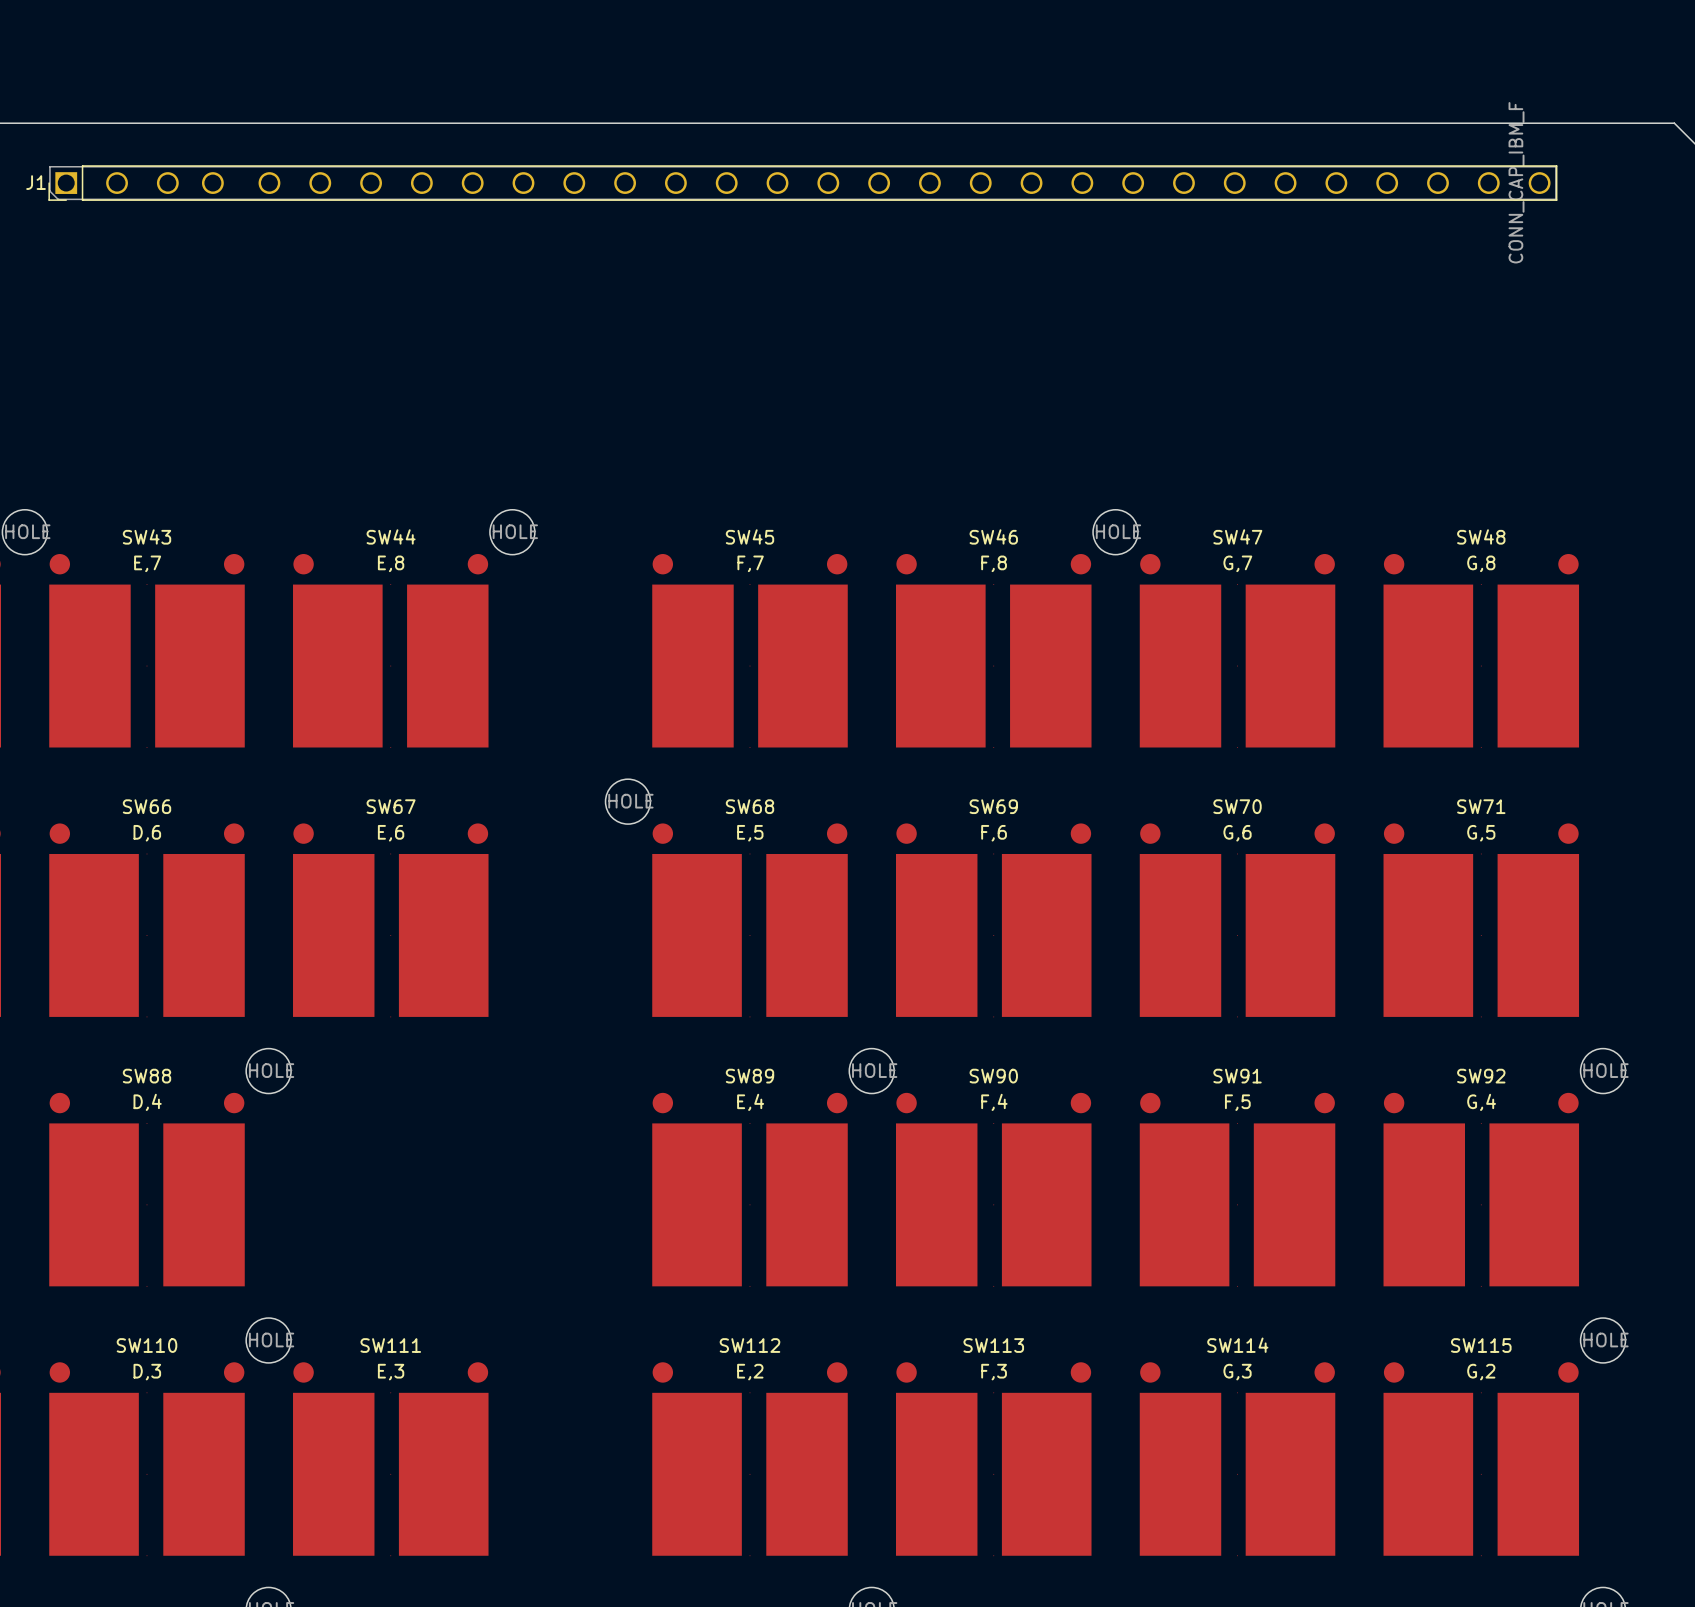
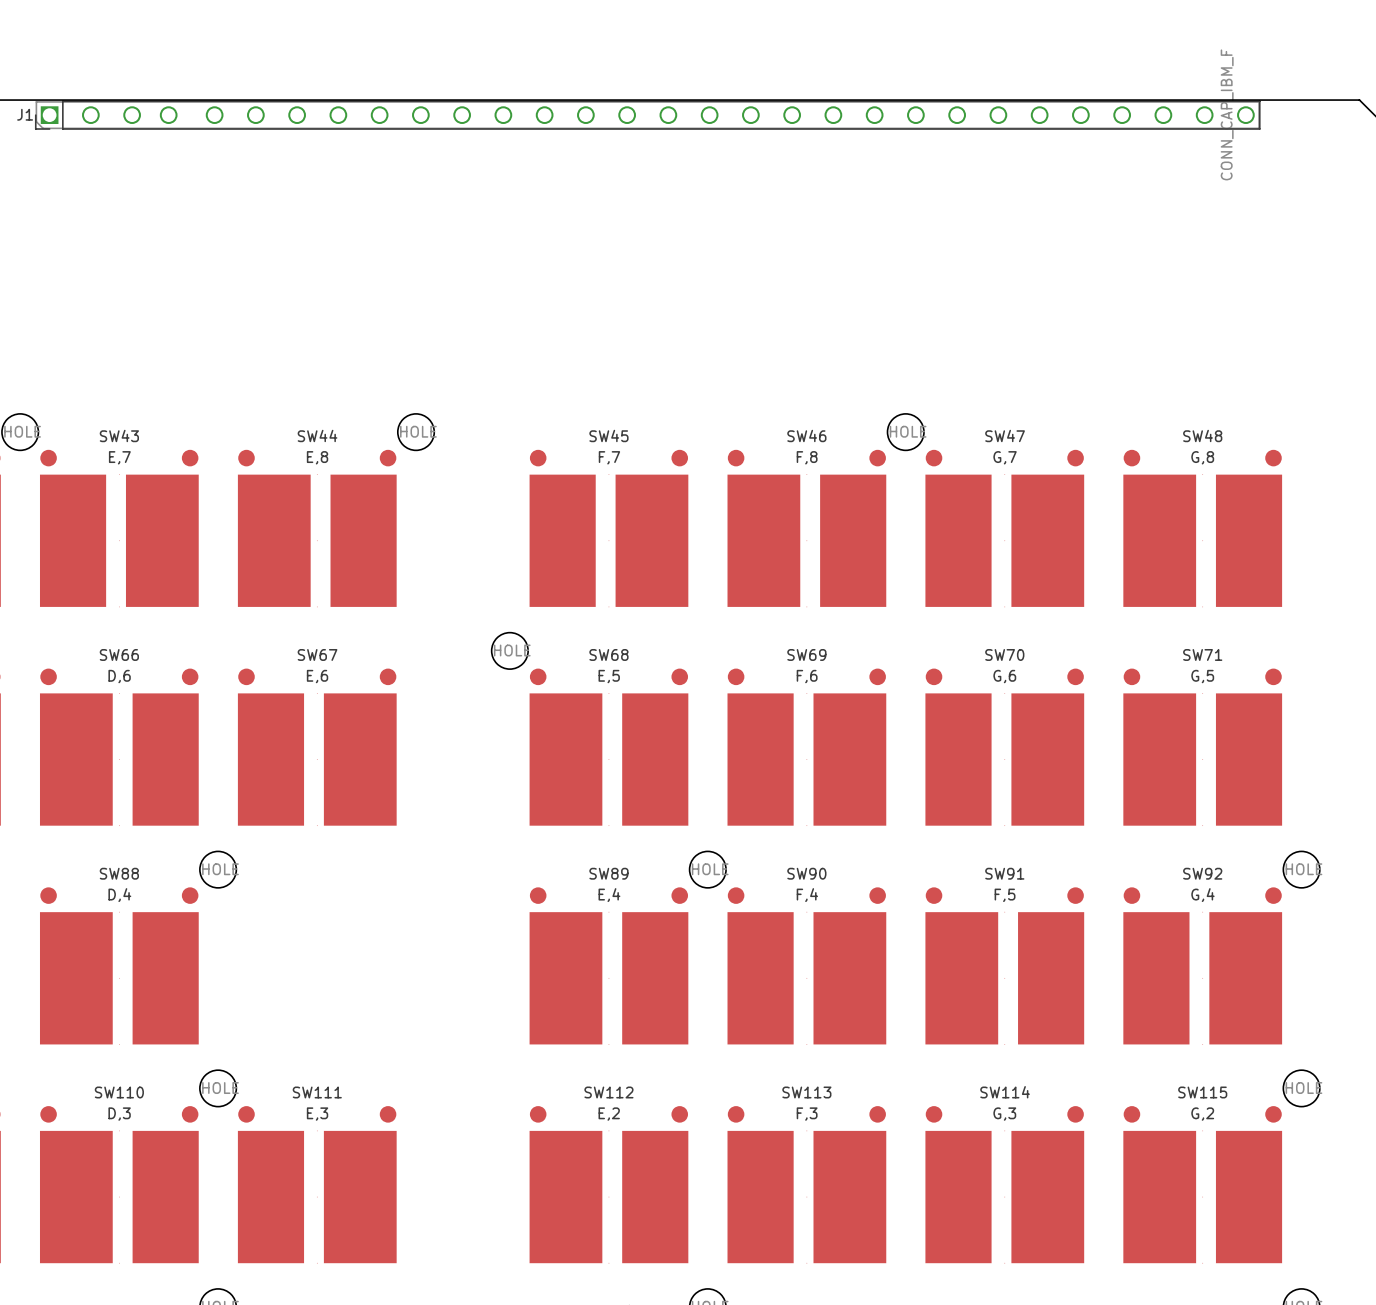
J1 position: (802, 183) -> (647, 115)

